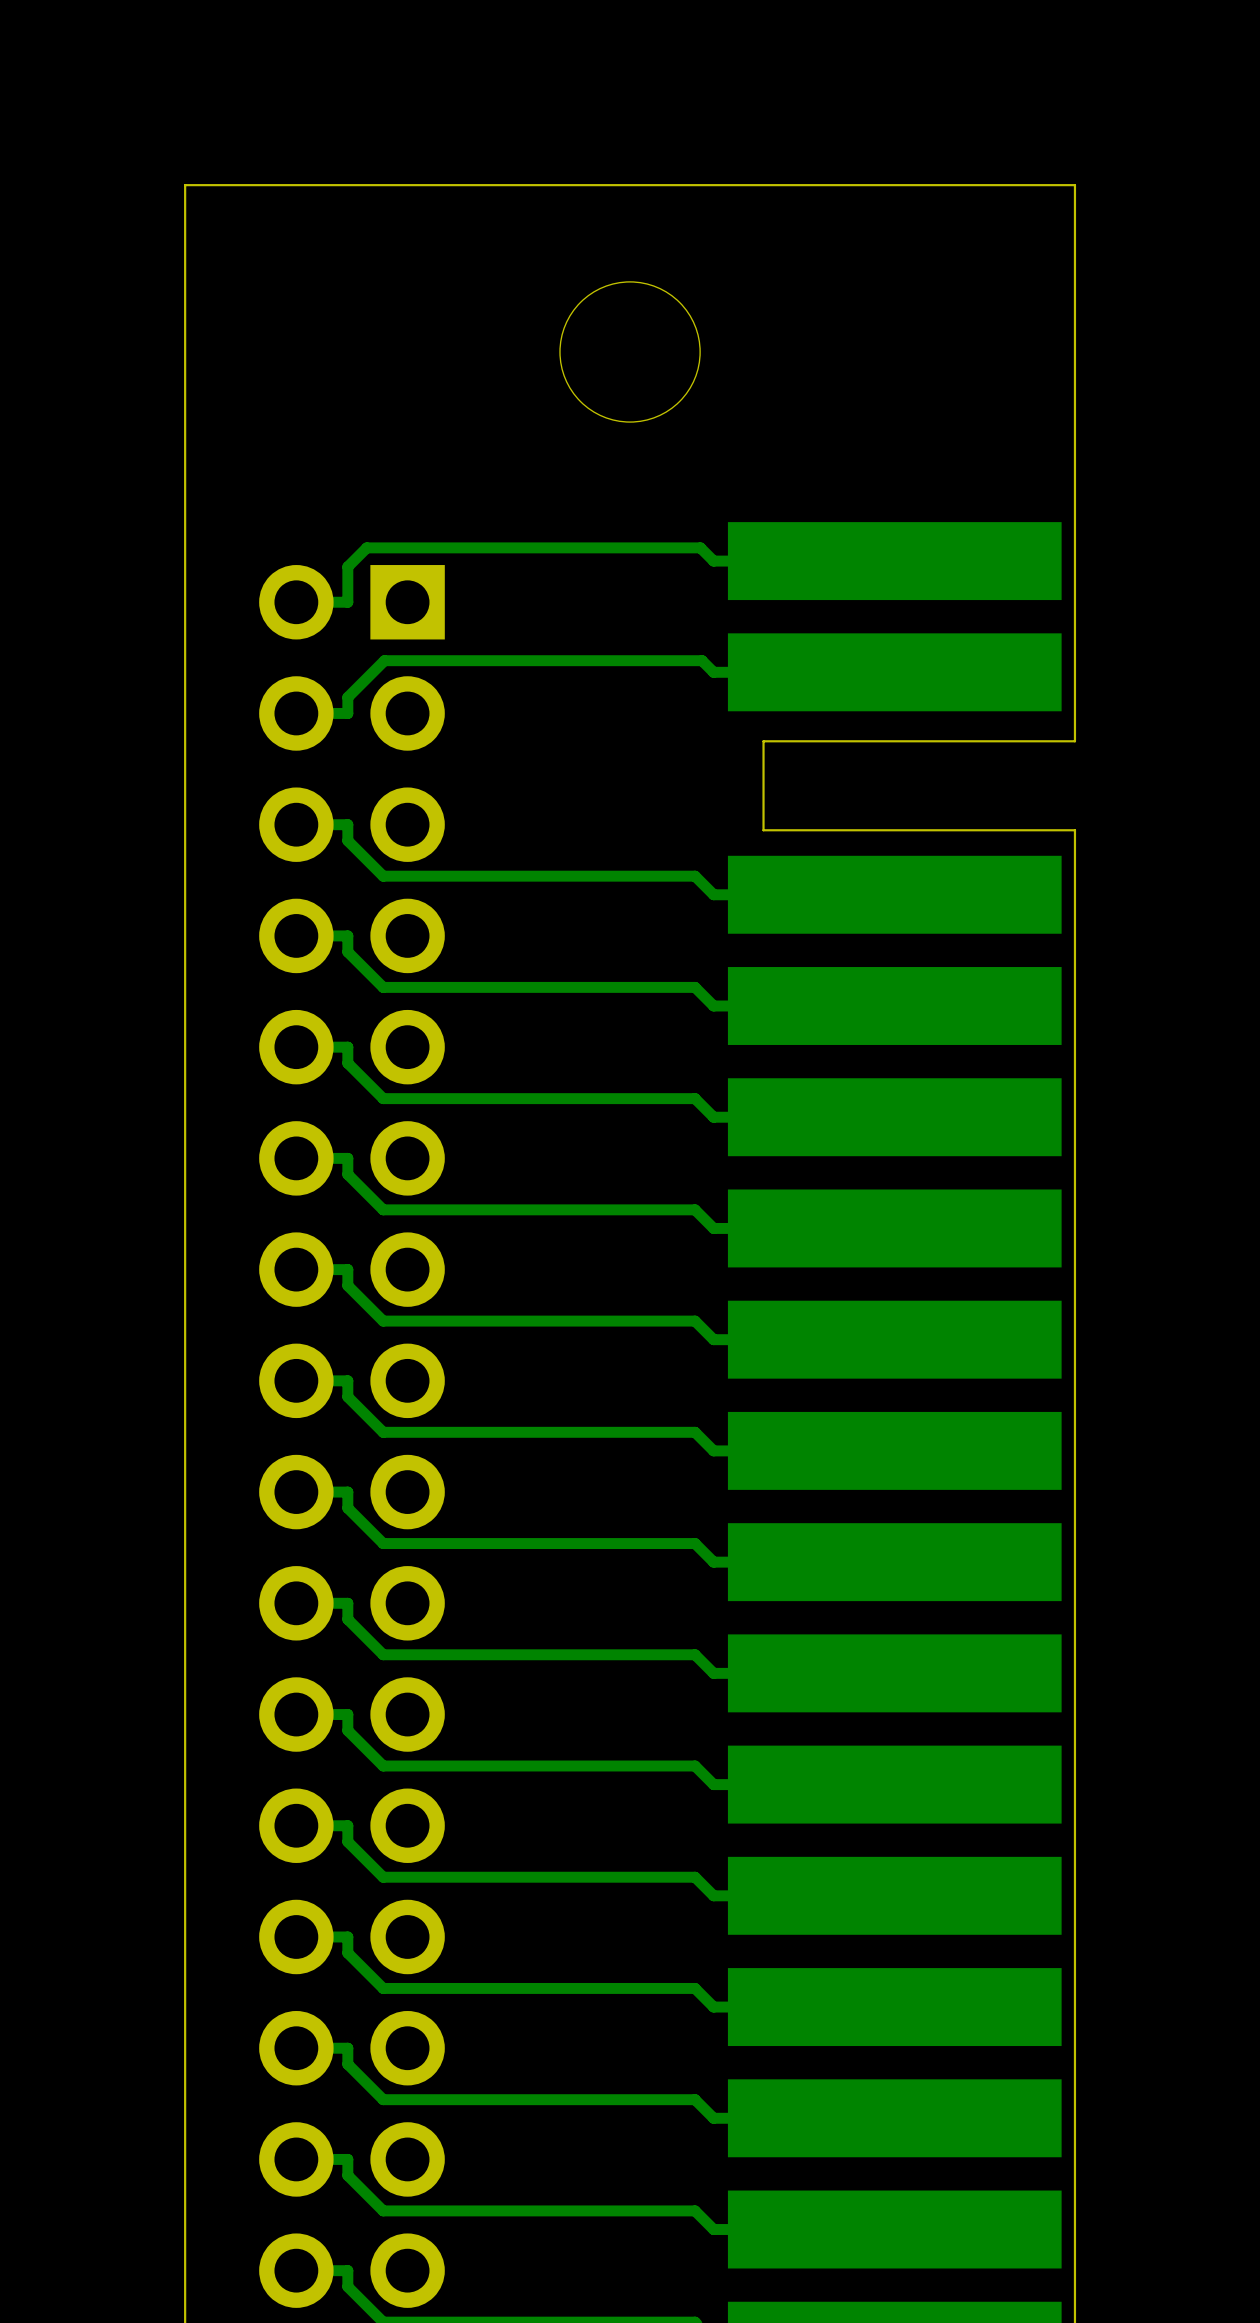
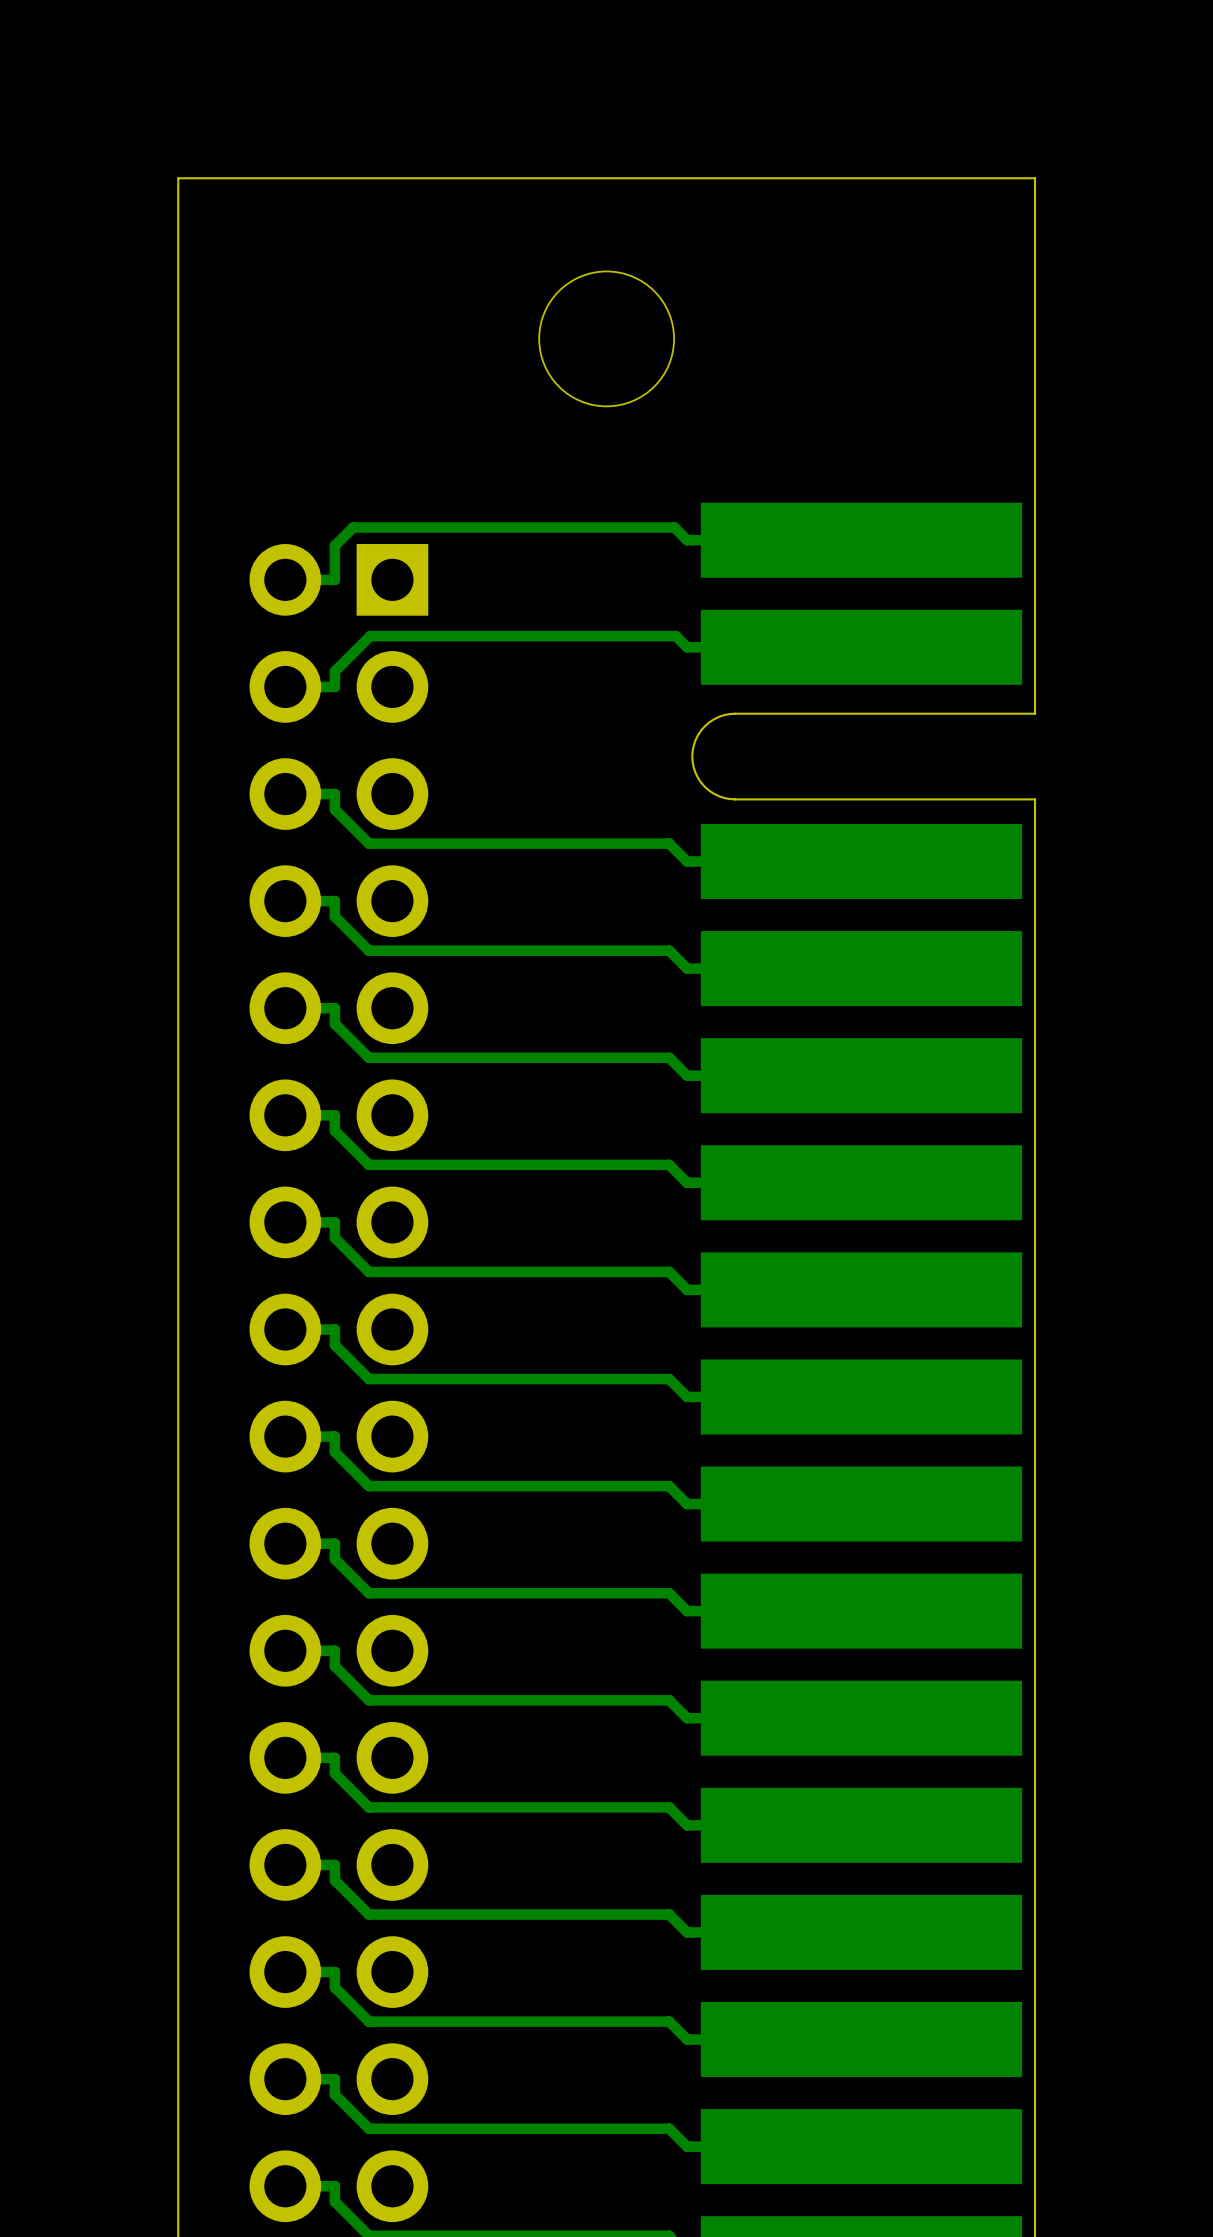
board edge: (763, 741) (763, 830) -> (735, 713) (718, 716) (704, 726) (695, 740) (692, 756) (695, 772) (704, 786) (718, 796) (735, 799)

